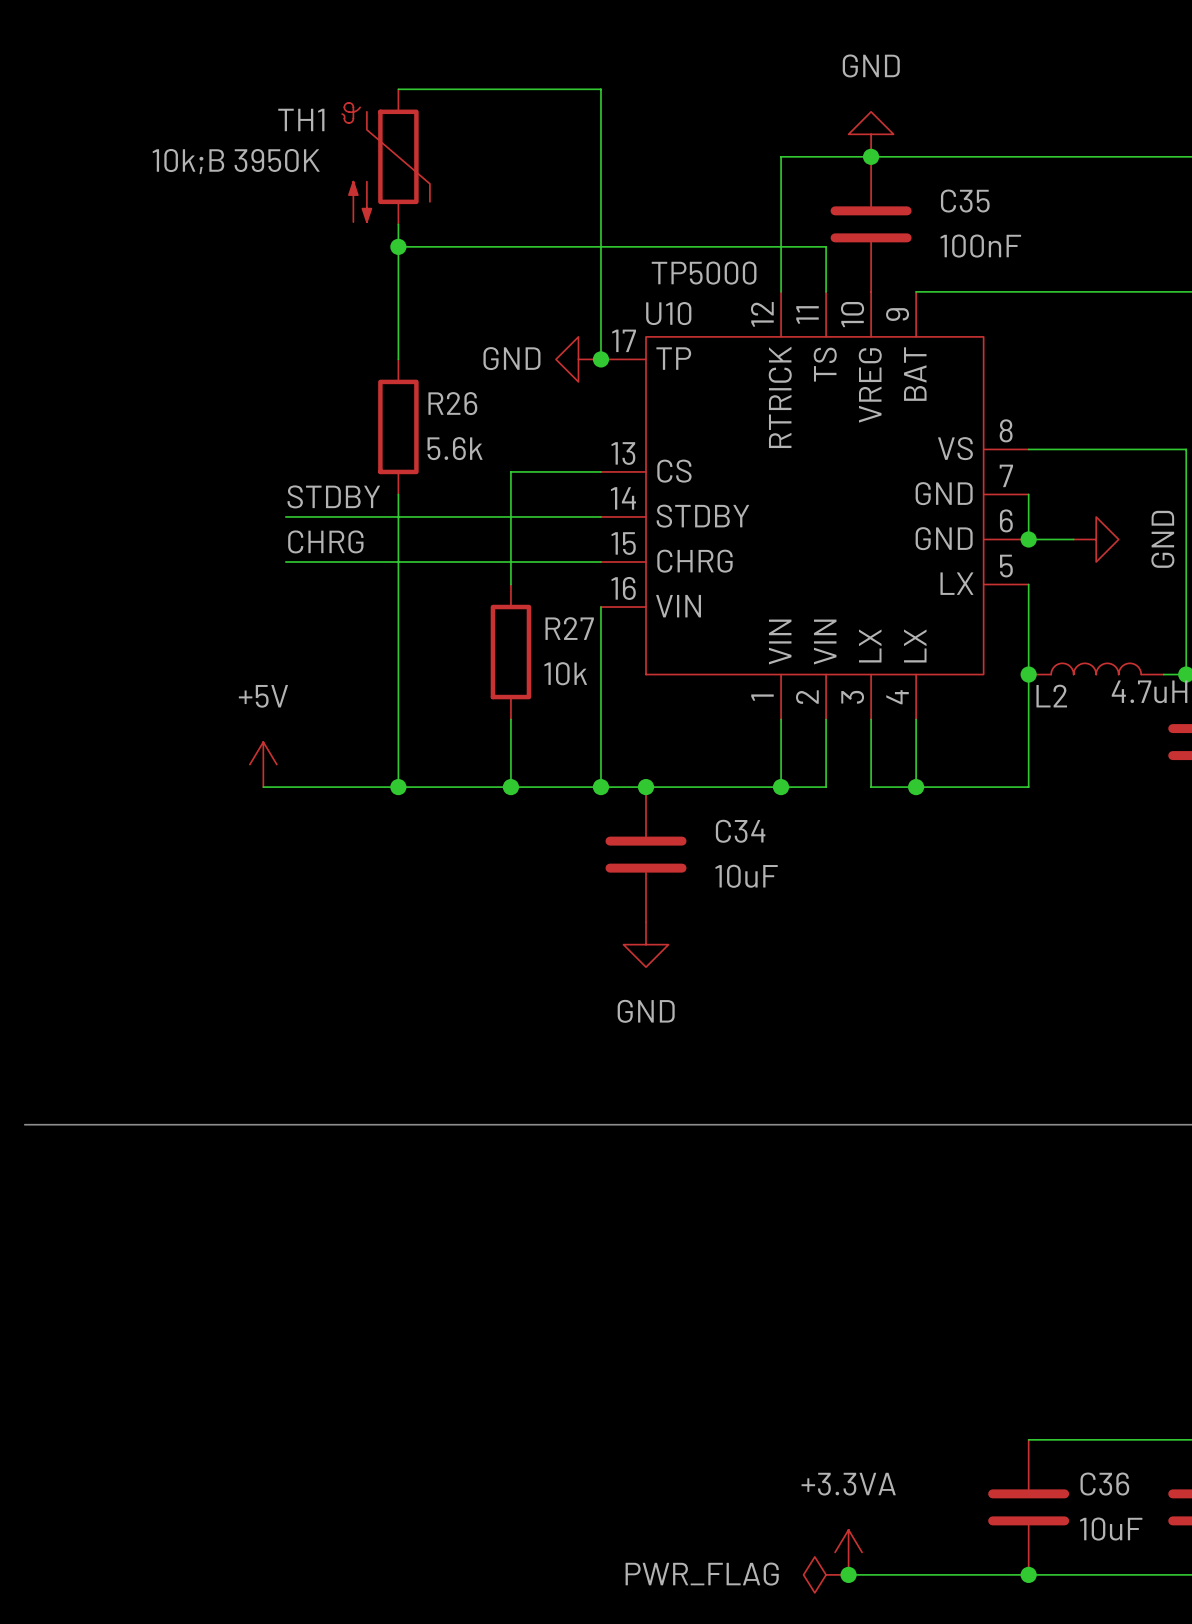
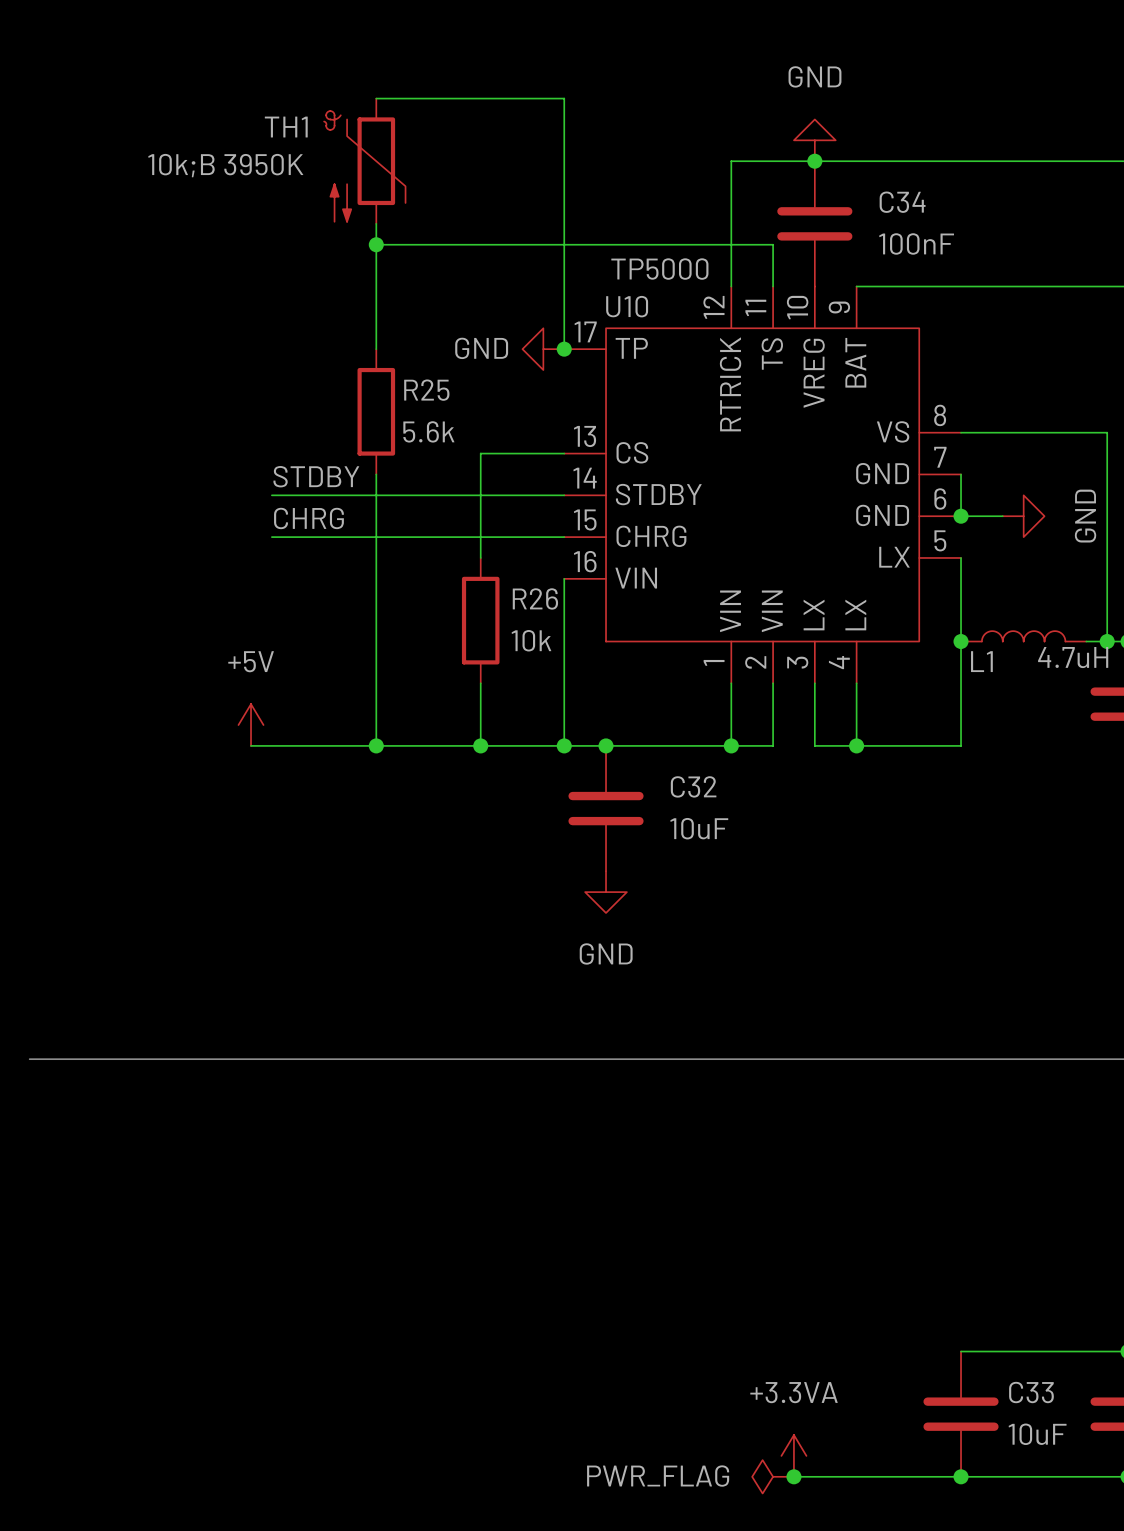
C35 name: C35 (965, 201) -> C34 (902, 202)
R26 name: R26 (452, 403) -> R25 (426, 390)
R27 name: R27 (569, 628) -> R26 (535, 598)
L2 name: L2 (1051, 696) -> L1 (981, 661)
C34 name: C34 (740, 831) -> C32 (693, 786)
C36 name: C36 (1104, 1484) -> C33 (1031, 1392)

